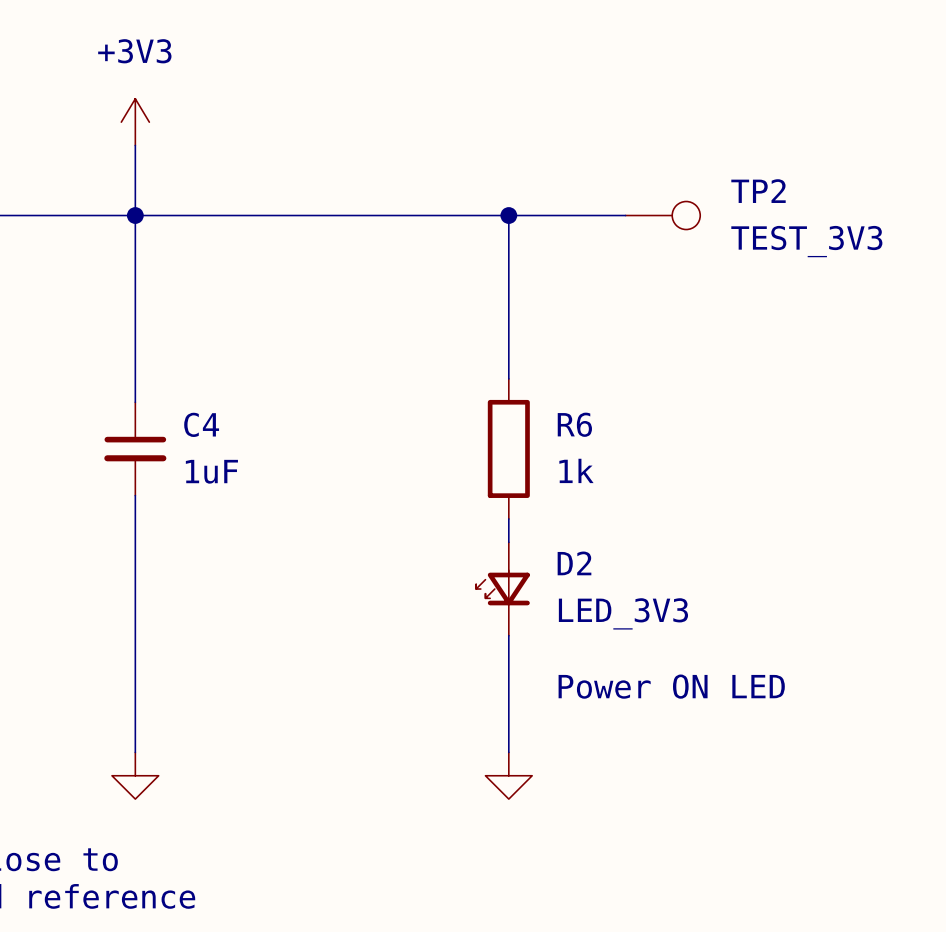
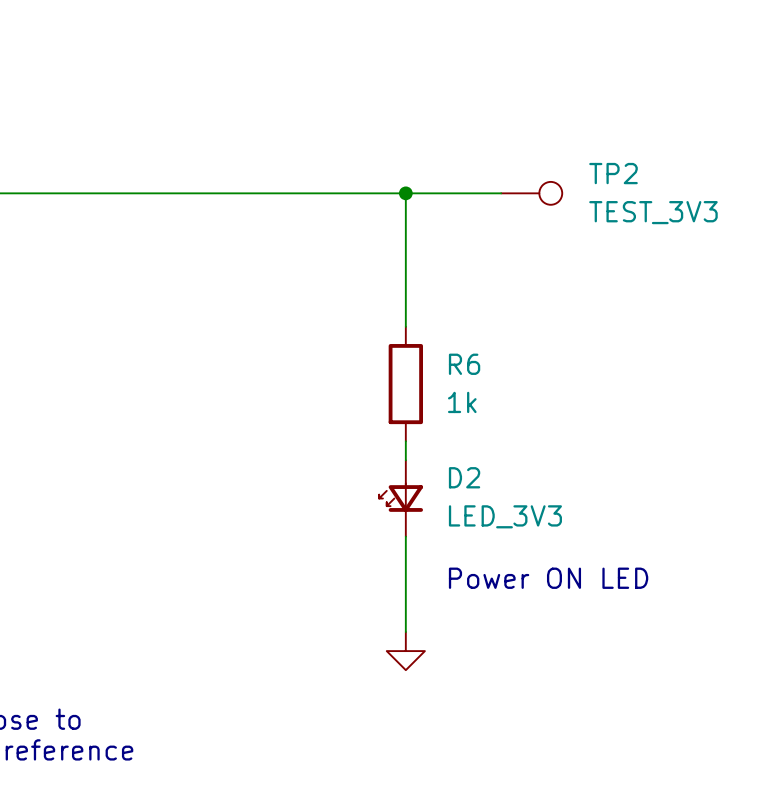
power symbol: +3V3 (135, 122) -> none
wire: (135, 145) (135, 402) -> none
junction: (135, 215) -> none
C4: 1uF (135, 448) -> none
wire: (135, 495) (135, 752) -> none
power symbol: (135, 775) -> none

